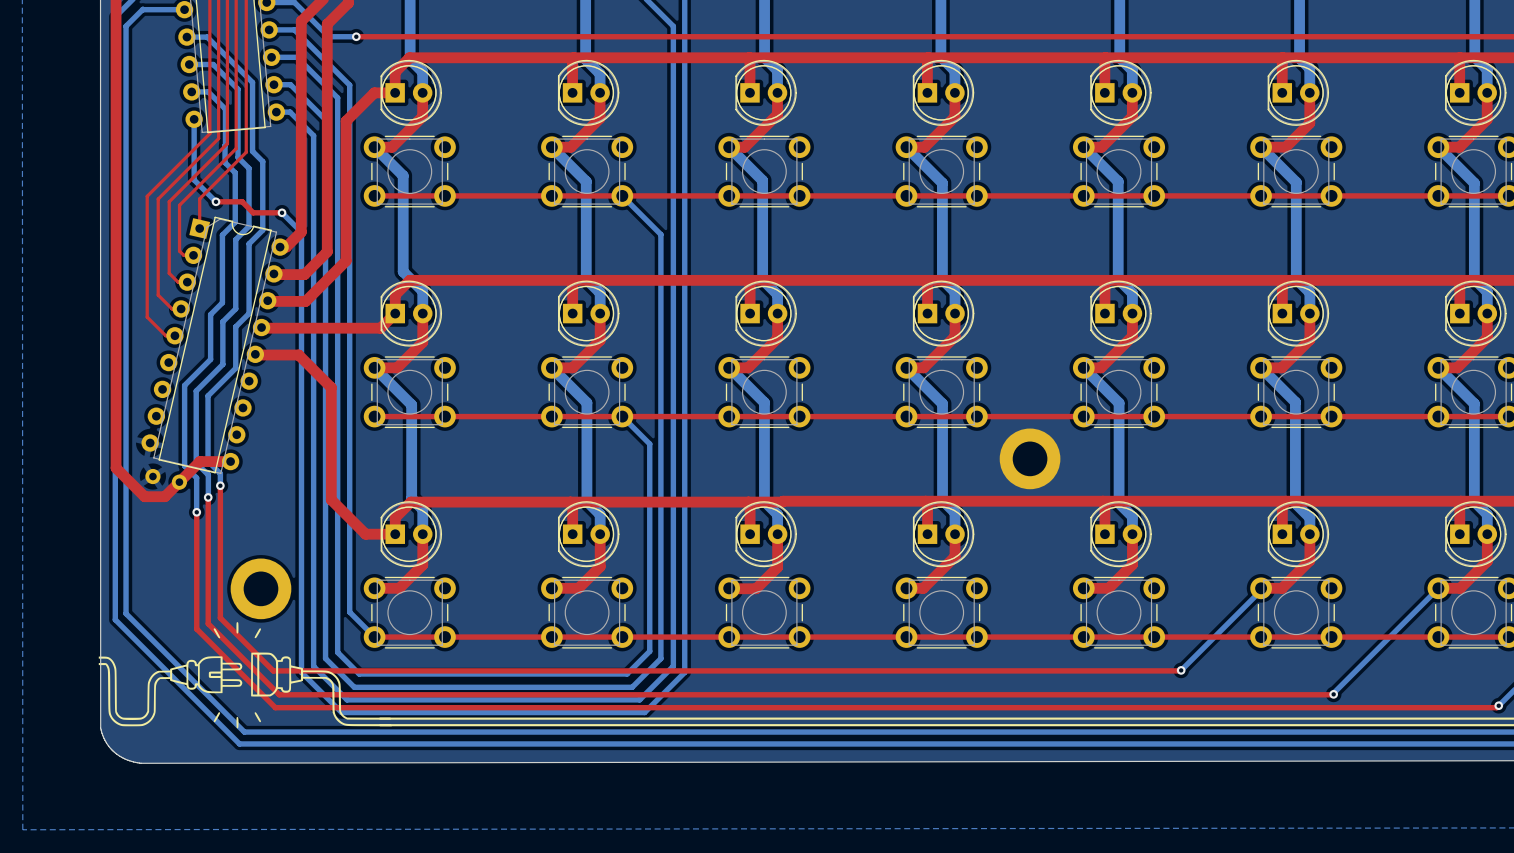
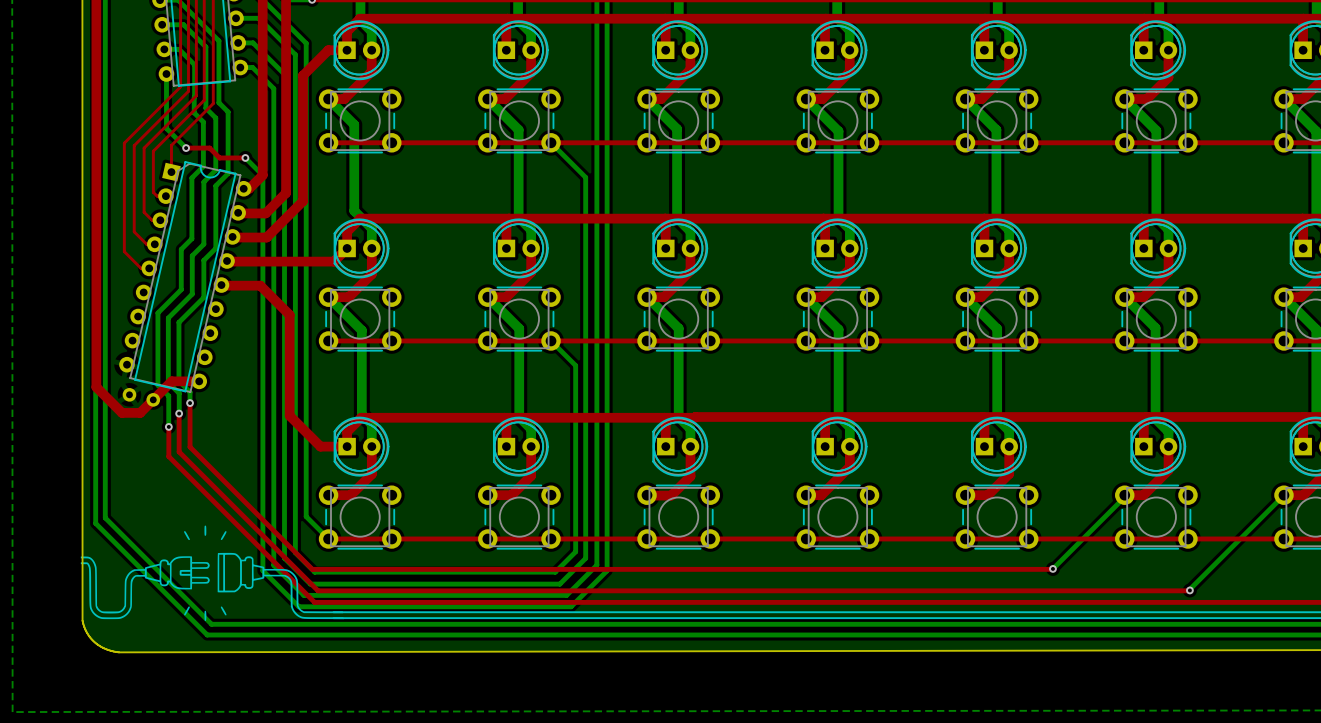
part: (1030, 458) -> none
top track: (220, 534) (220, 617) (273, 670) (356, 670) -> (190, 447) (312, 569)
top track: (208, 540) (208, 623) (279, 694) (362, 694) -> (179, 451) (318, 590)
top track: (196, 545) (196, 629) (275, 707) (359, 707) -> (168, 456) (314, 602)
part: (260, 588) -> none

